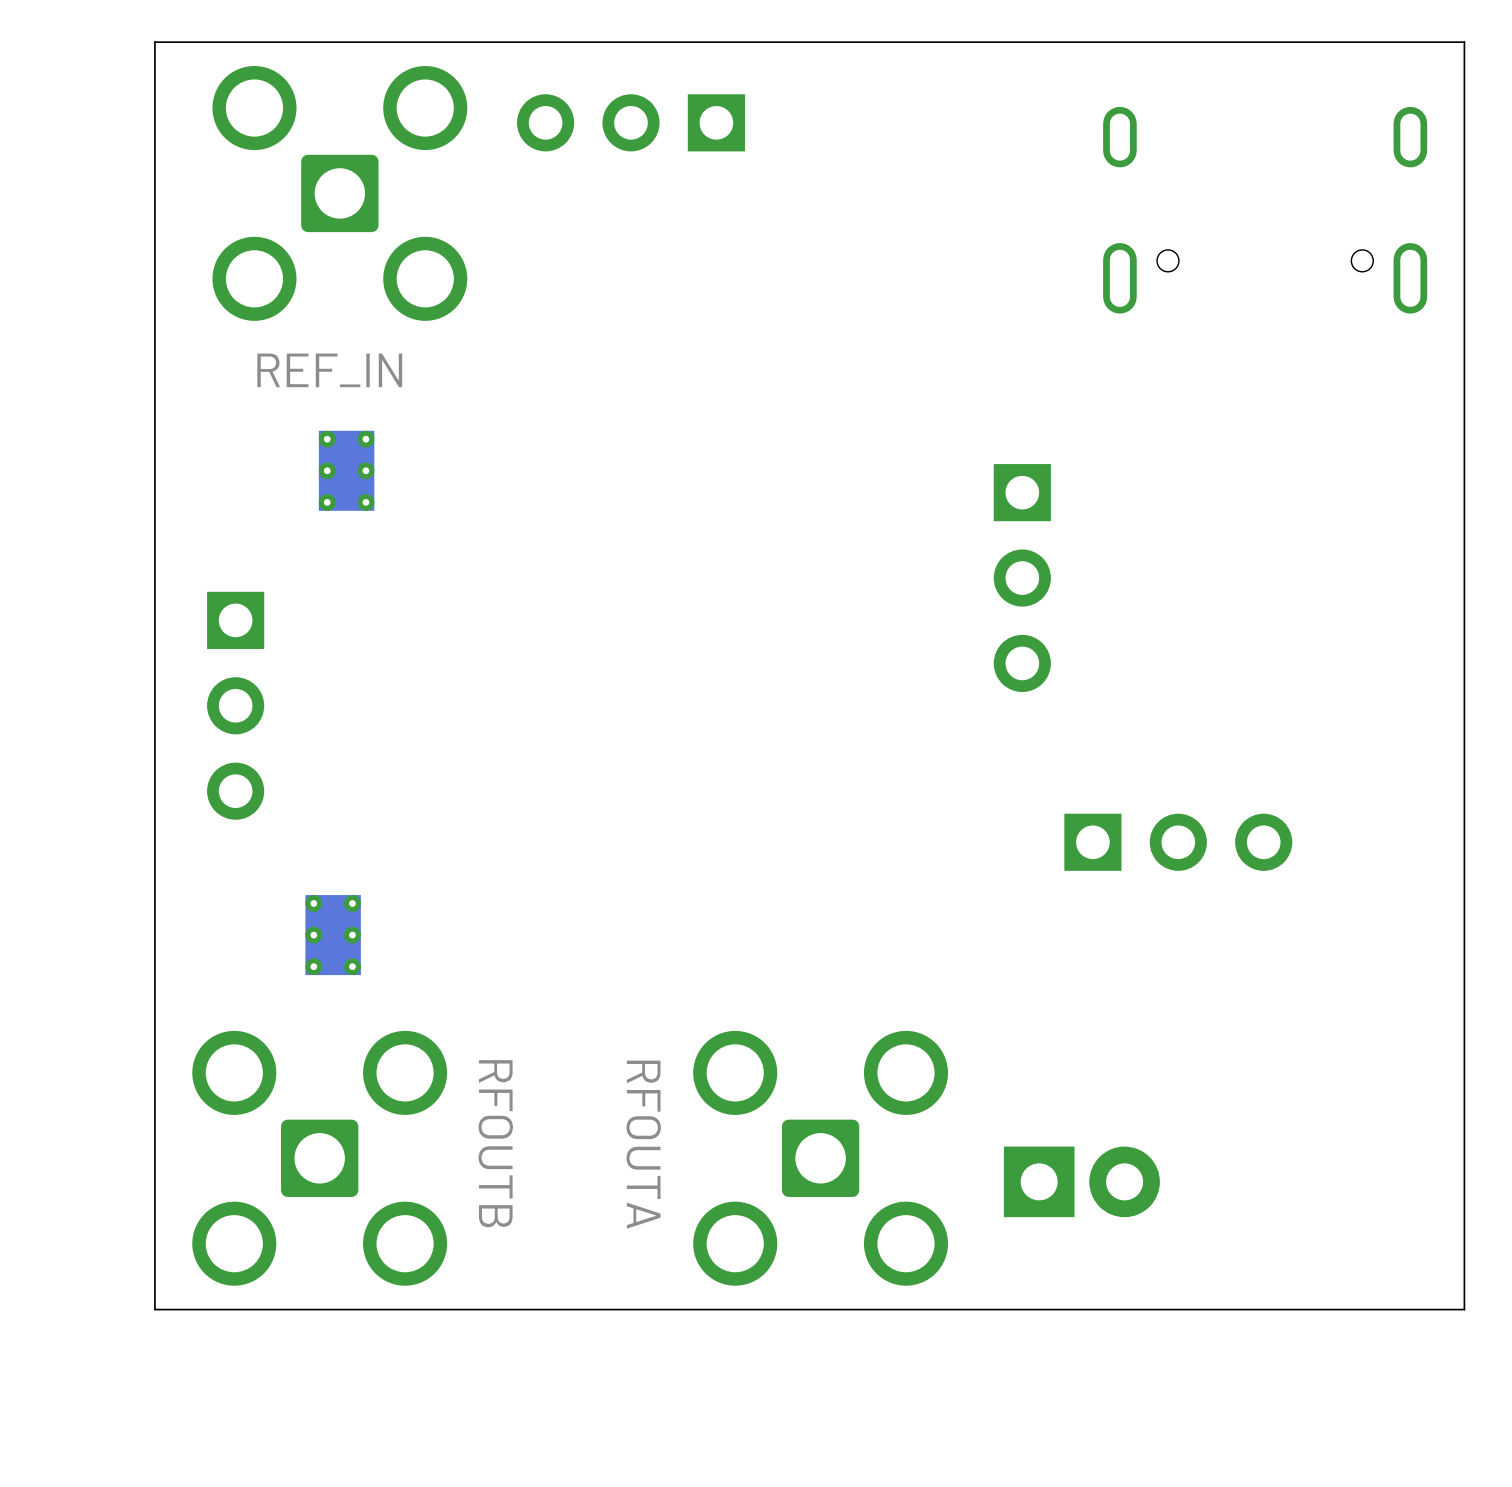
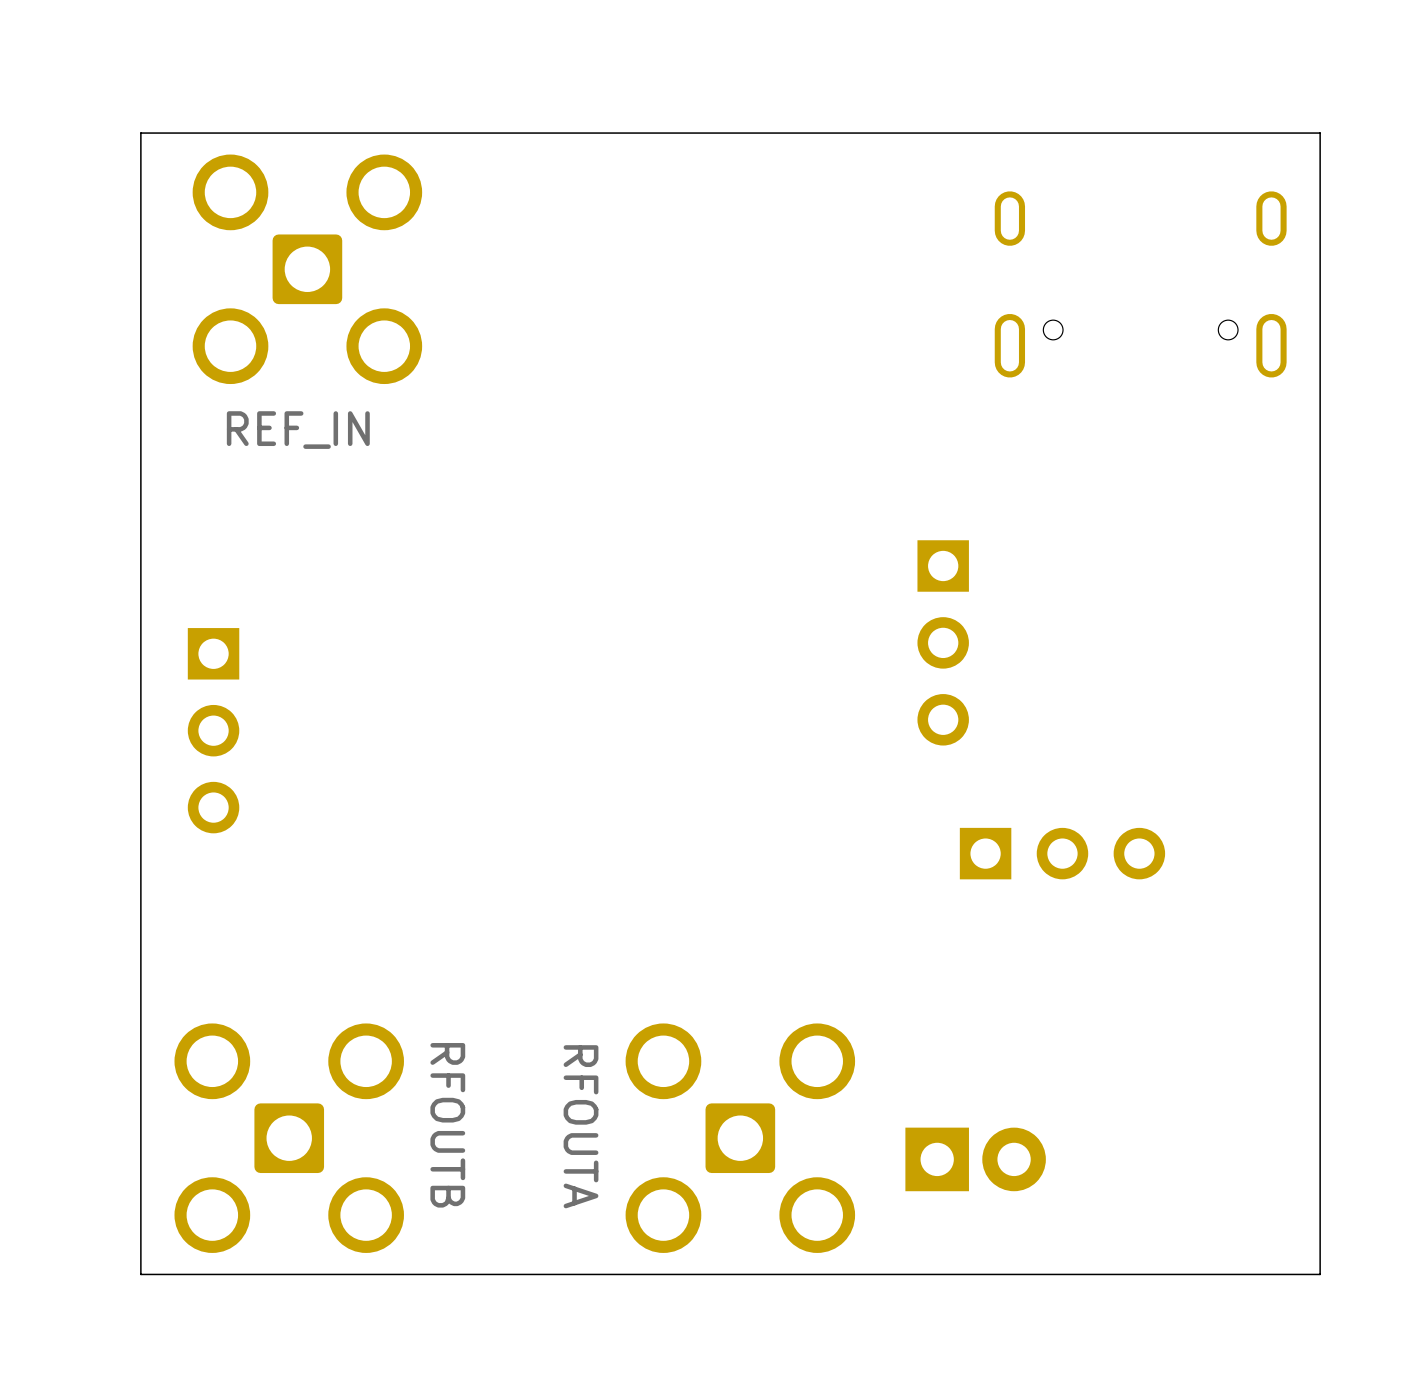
part: (631, 122) -> none
part: (346, 470) -> none
part position: (1022, 578) -> (943, 642)
part: (333, 935) -> none

